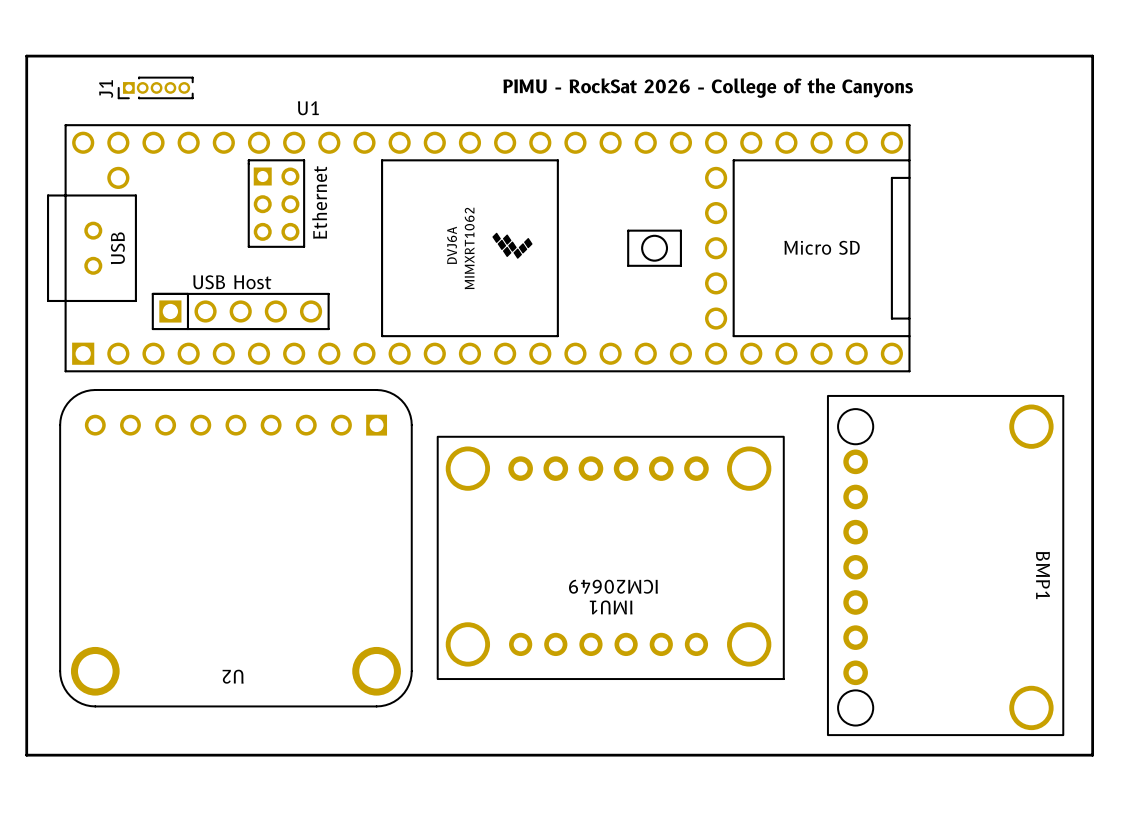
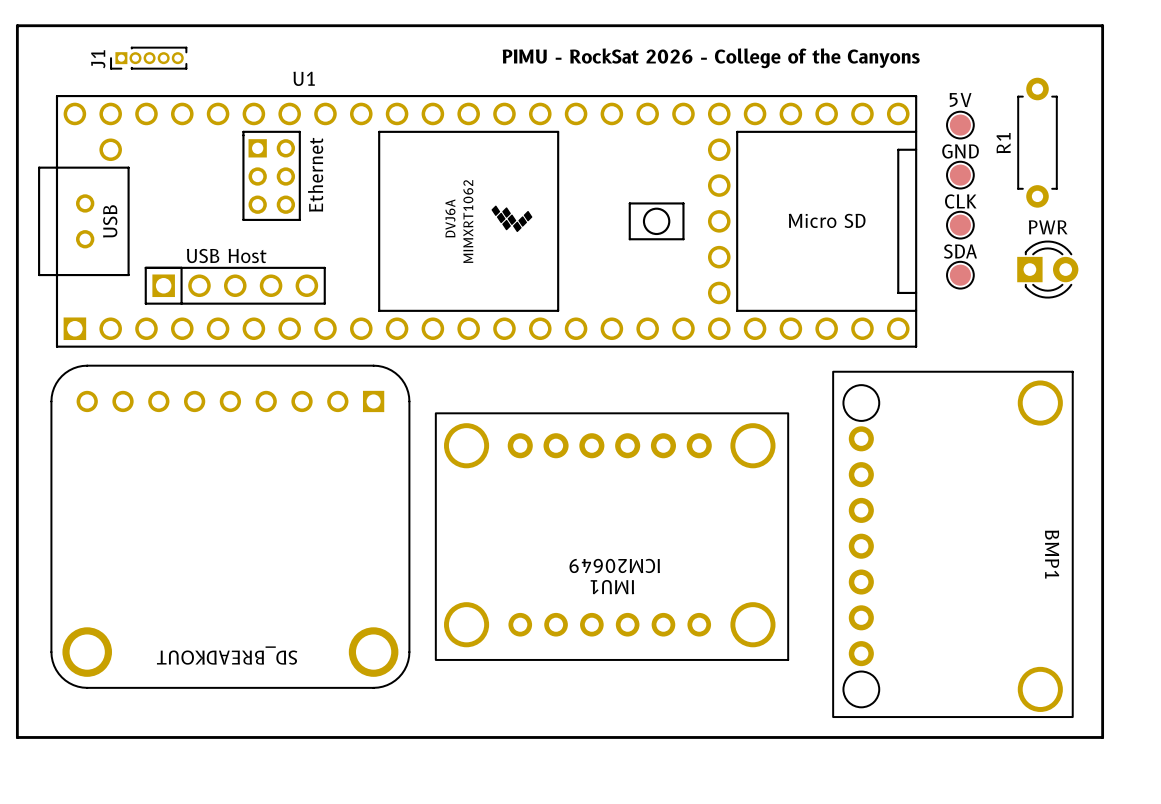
part: none -> 5V (960, 125)
R1: none -> (1037, 142)
GND: none -> (960, 175)
CLK: none -> (960, 225)
PWR: none -> (1047, 269)
SDA: none -> (960, 275)
U2 name: U2 (233, 676) -> SD_BREADKOUT (227, 655)

